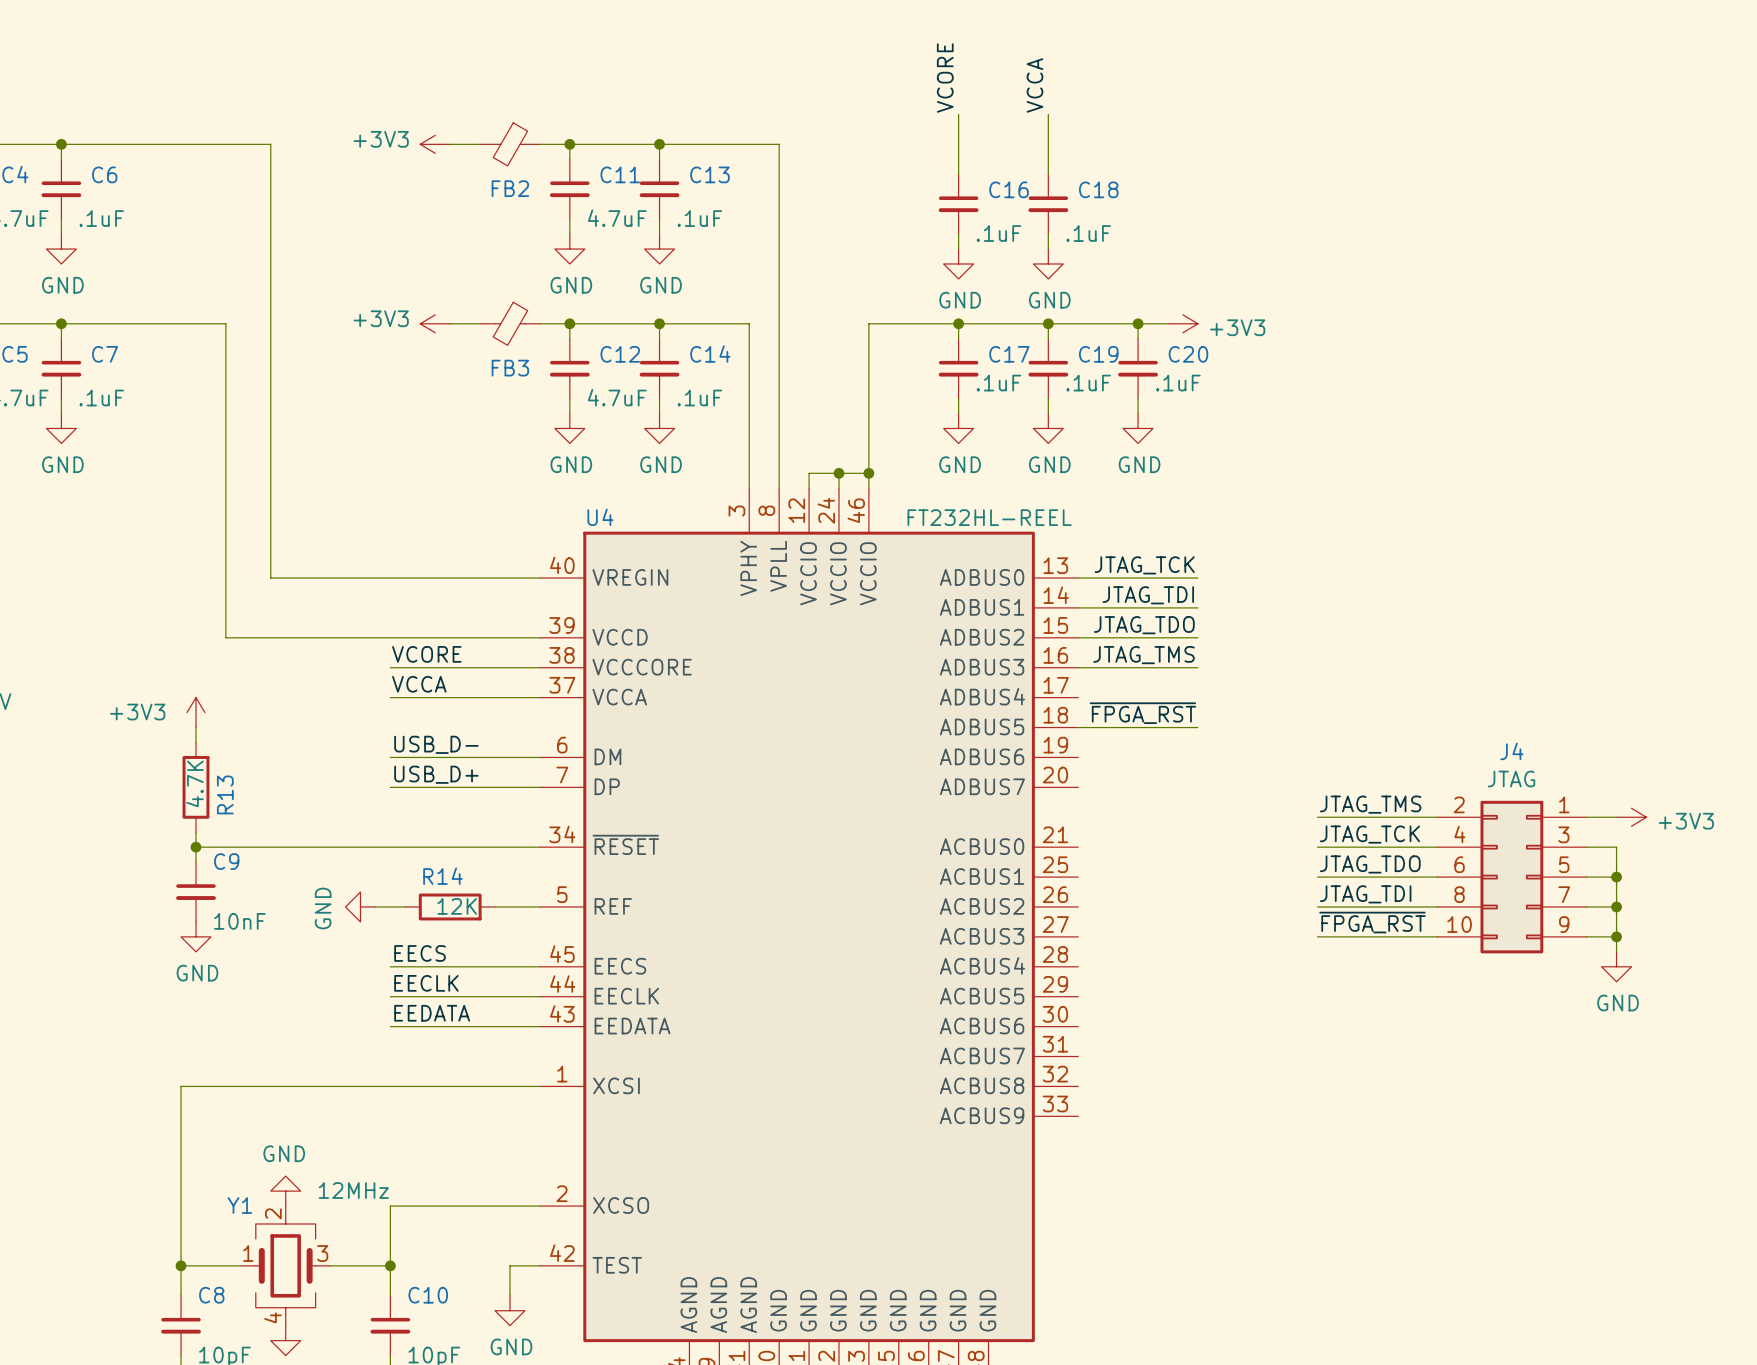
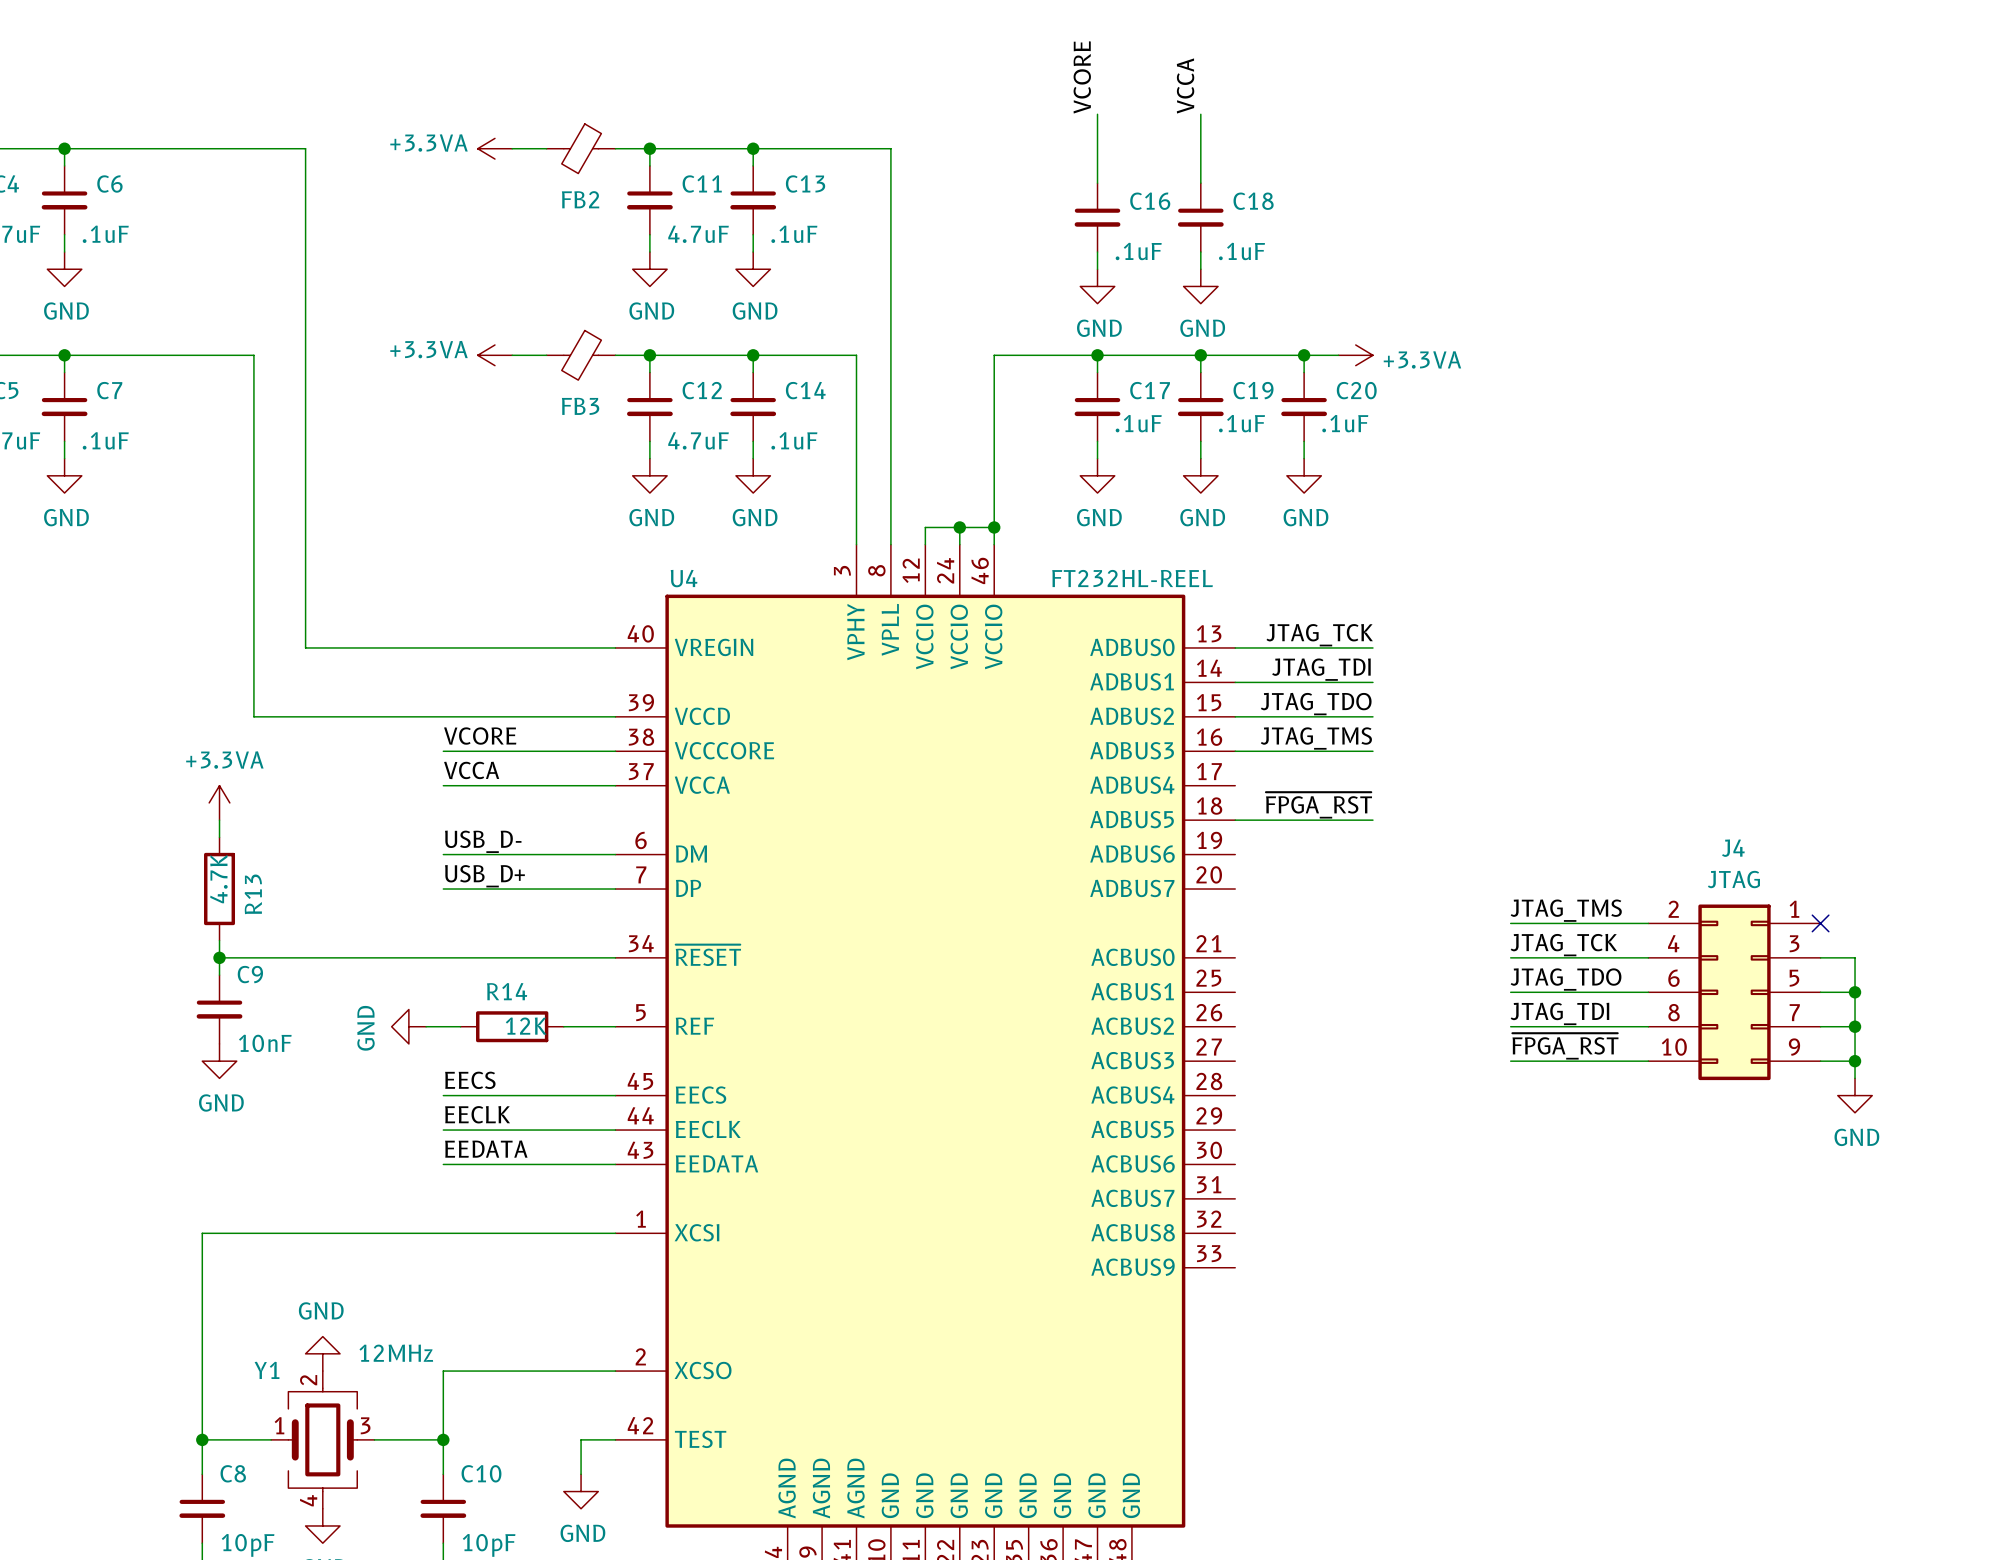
power symbol: +3V3 (435, 144) -> +3.3VA (494, 148)
power symbol: +3V3 (435, 323) -> +3.3VA (494, 355)
power symbol: +3V3 (1182, 323) -> +3.3VA (1355, 355)
power symbol: +3V3 (195, 712) -> +3.3VA (219, 802)
wire: (1586, 817) (1616, 817) -> none
no-connect mark: none -> (1820, 923)
power symbol: +3V3 (1631, 817) -> none

